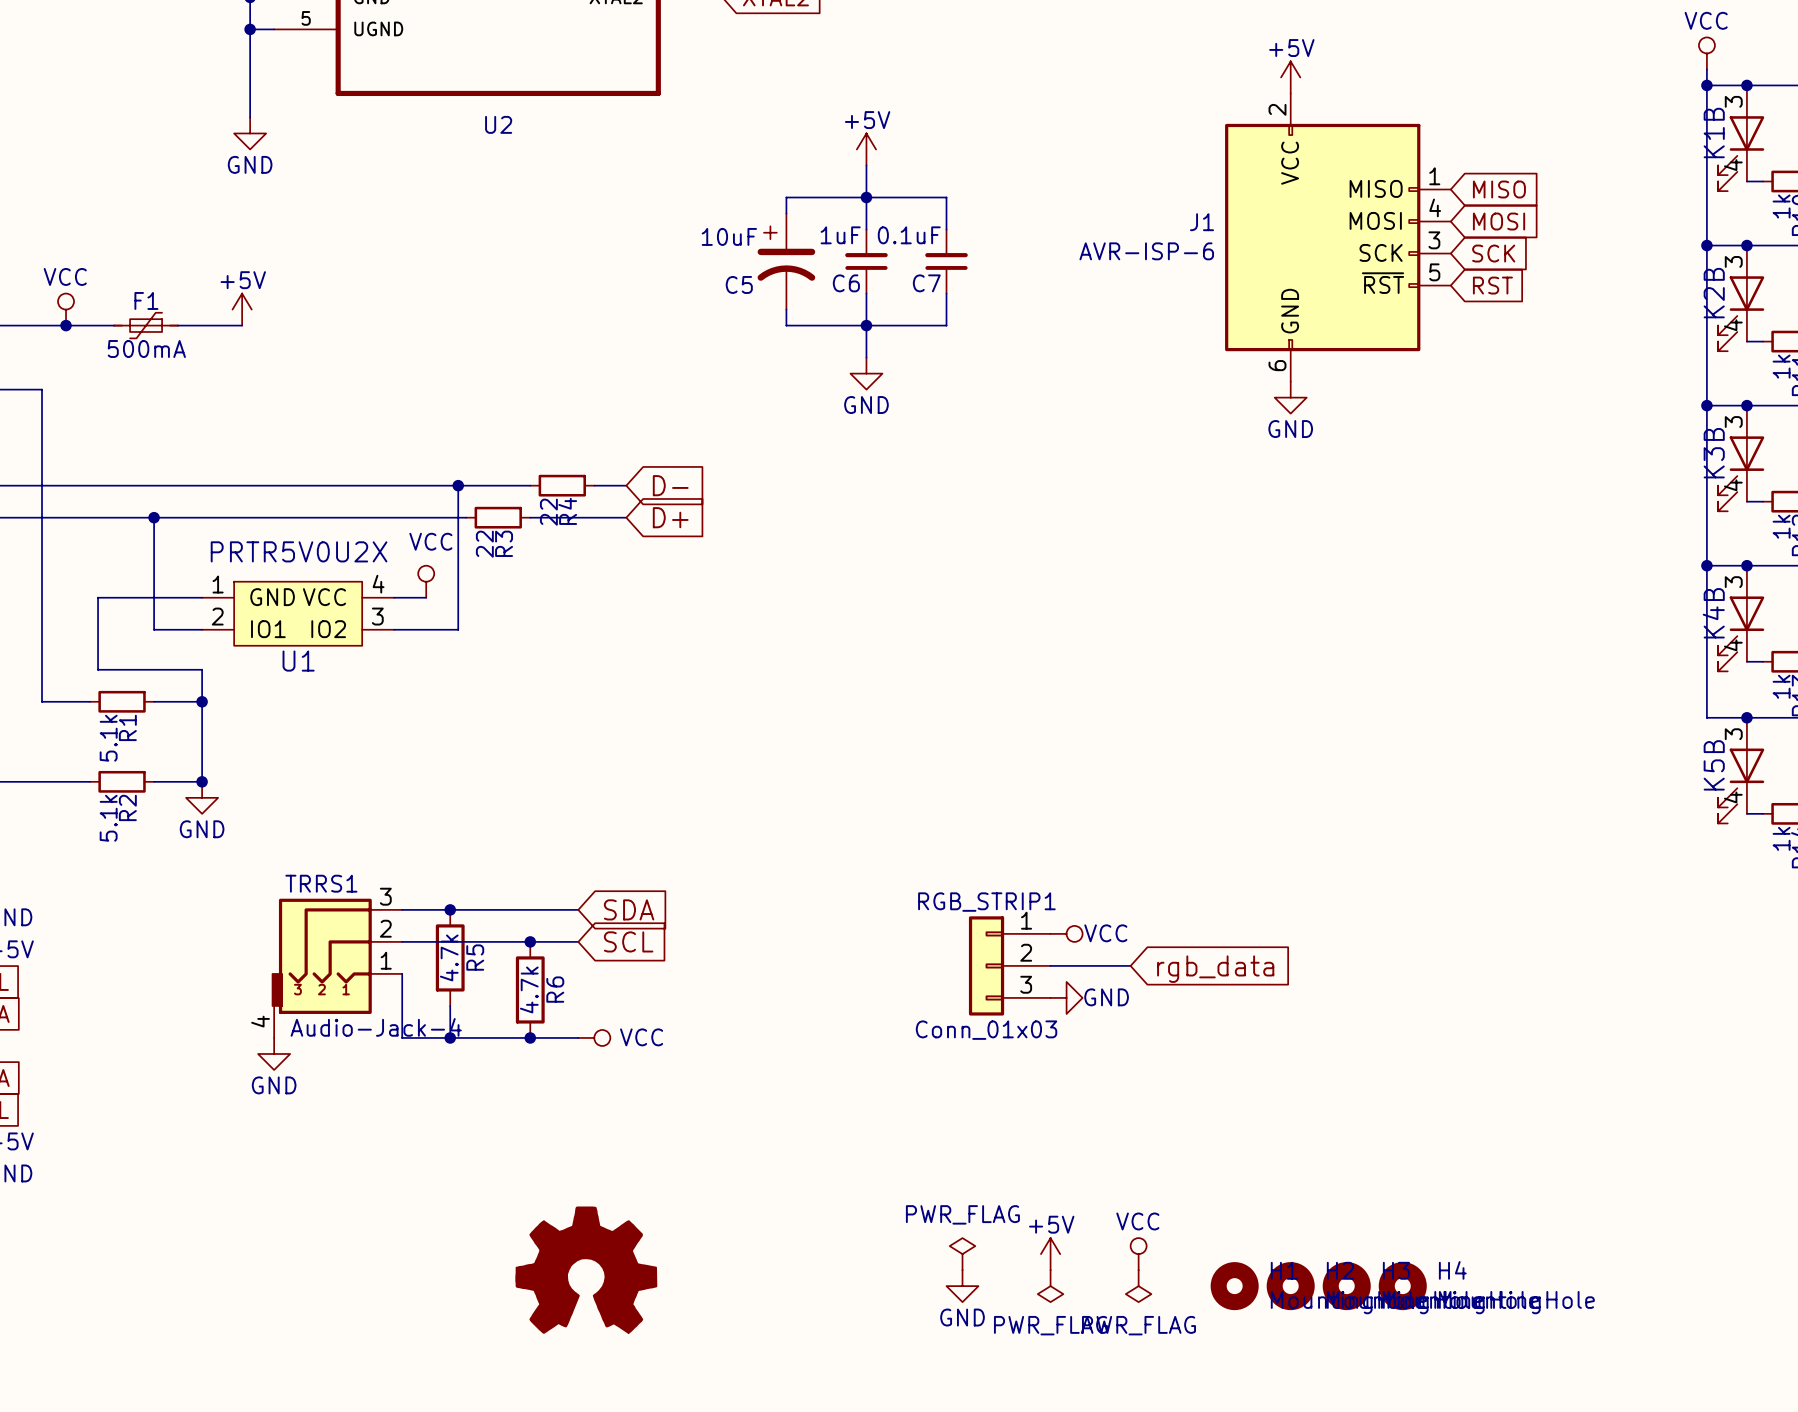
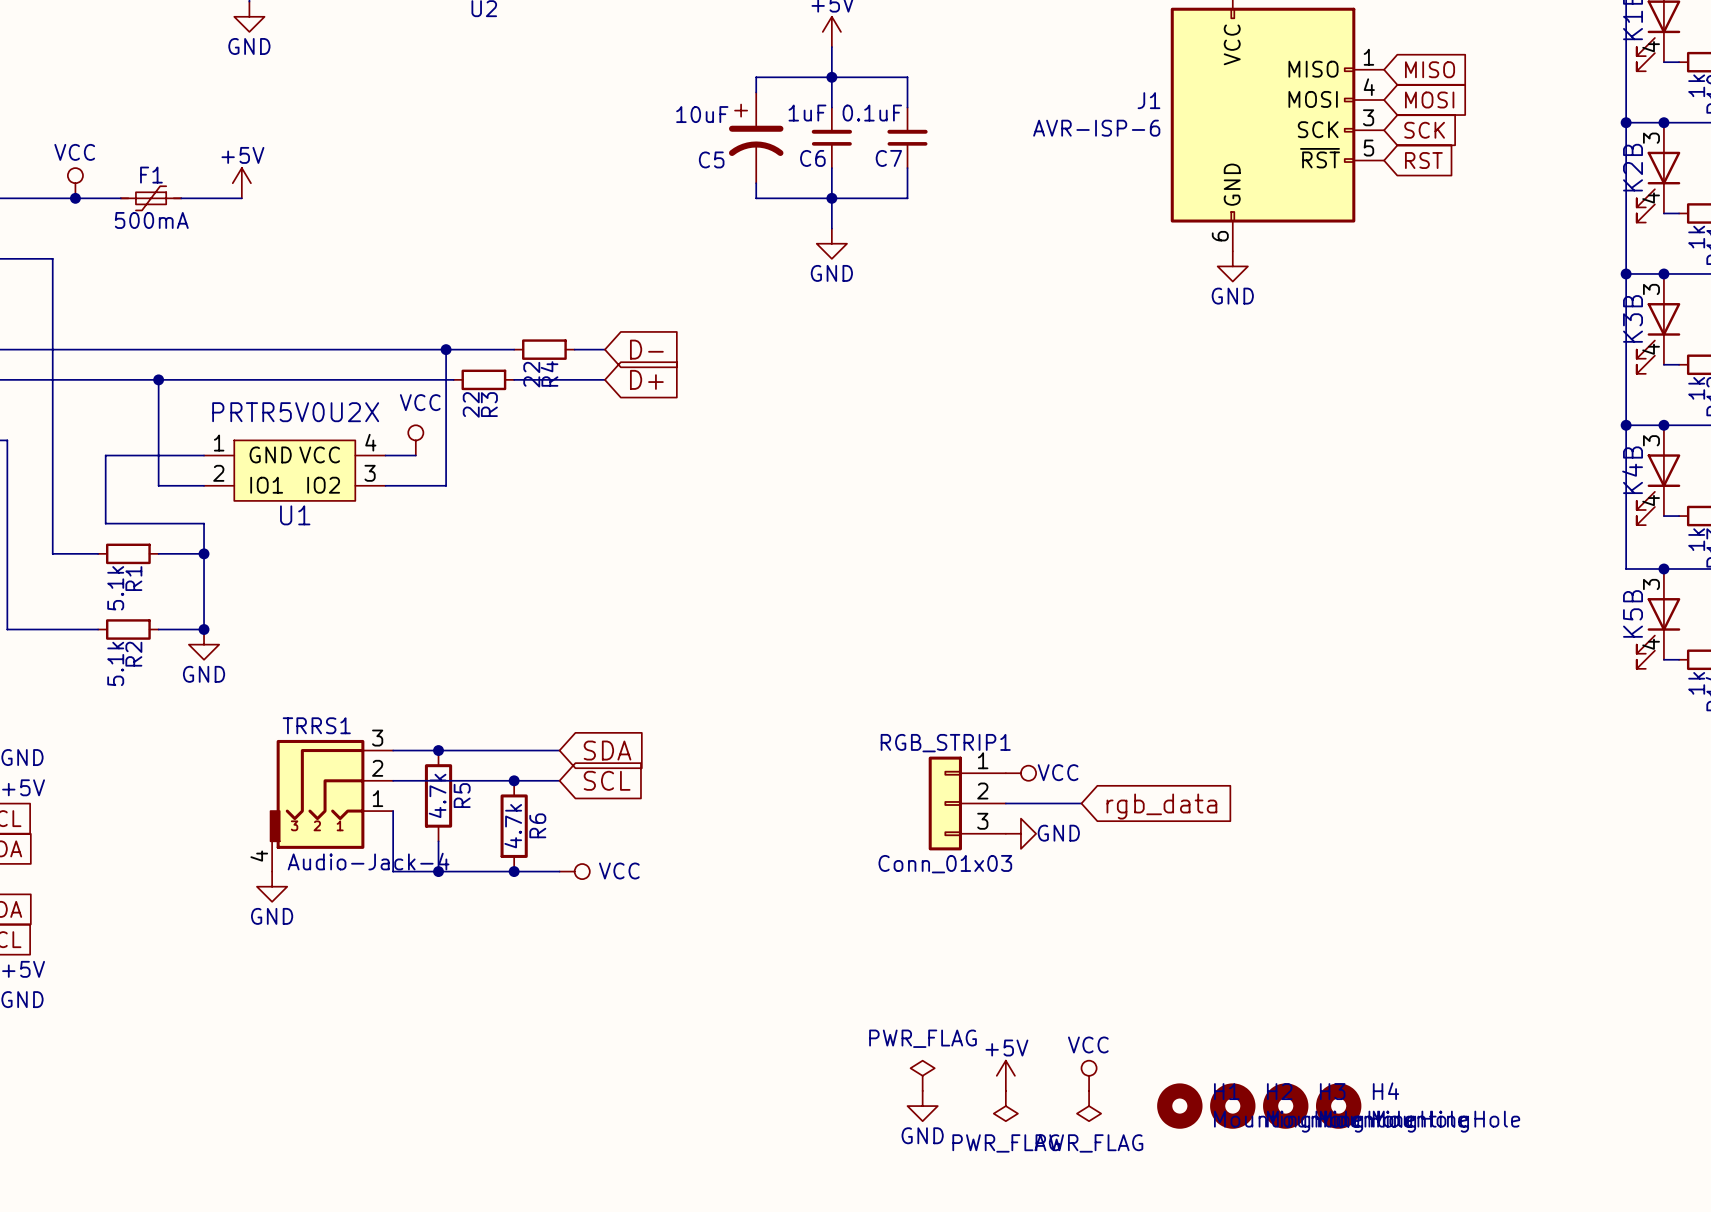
power symbol: (586, 1270) -> none

